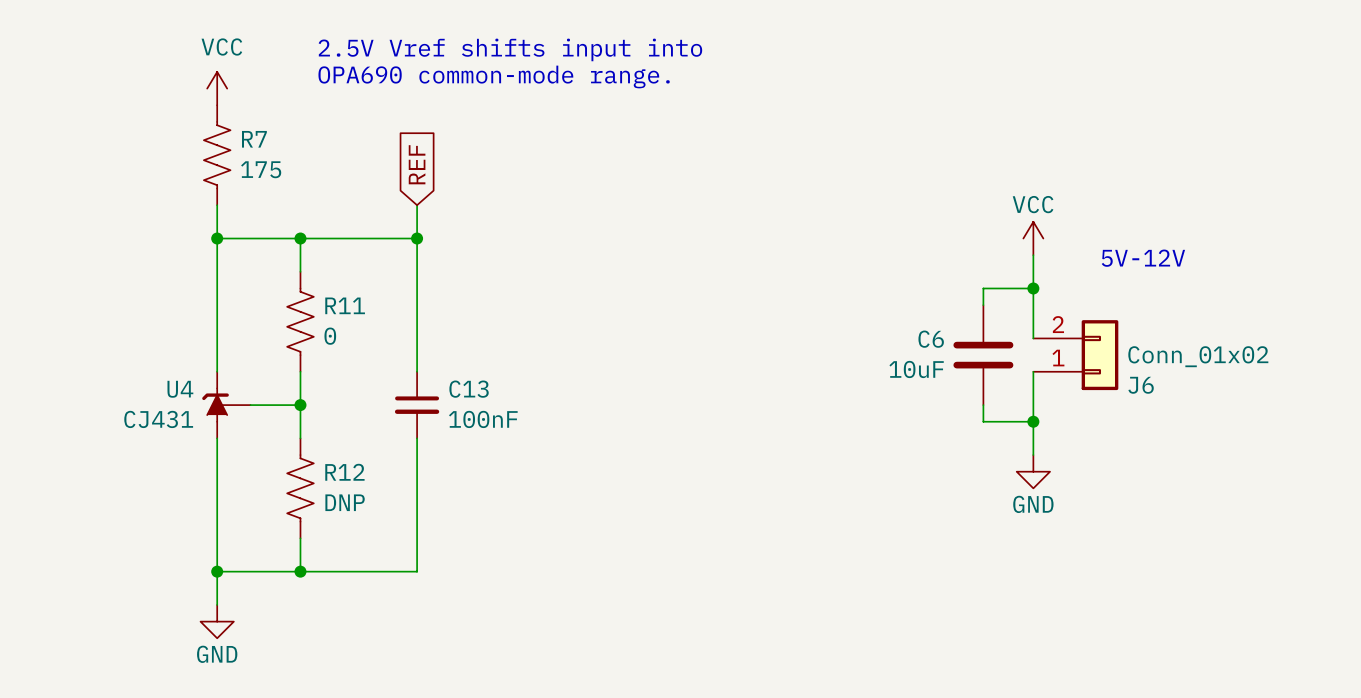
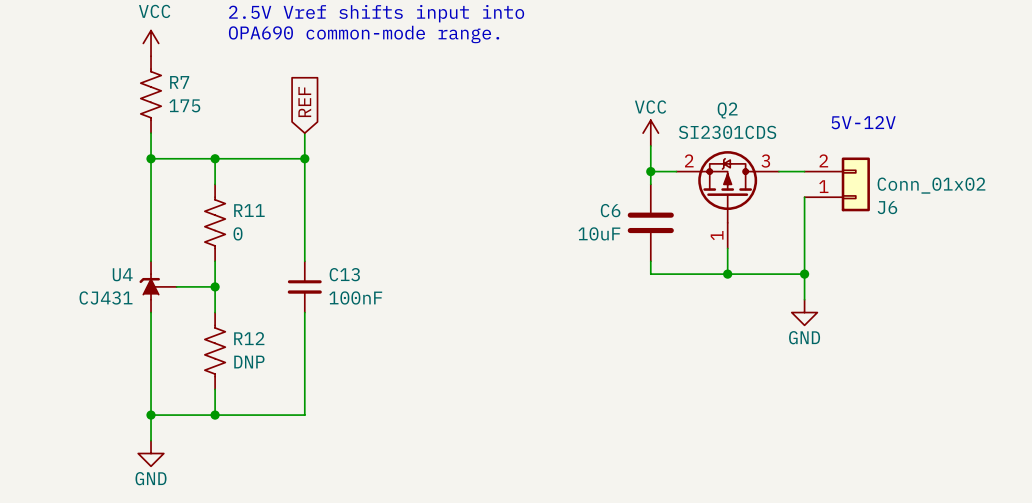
wire: none -> (650, 145) (650, 184)
power symbol position: VCC (1033, 238) -> VCC (650, 133)
wire: none -> (650, 171) (676, 171)
junction: none -> (650, 171)
wire: (1033, 255) (1033, 338) -> (778, 171) (804, 171)
text position: 5V-12V (1143, 258) -> 5V-12V (863, 122)
wire: (1033, 288) (983, 288) (983, 305) -> none
junction: (1033, 288) -> none
wire: none -> (804, 197) (804, 299)
Q2: none -> SI2301CDS (727, 199)
wire: none -> (727, 248) (727, 274)
C6 position: (983, 355) -> (650, 222)
J6 position: (1075, 355) -> (837, 184)
wire: none -> (650, 261) (650, 274) (804, 274)
wire: (1033, 371) (1033, 455) -> none
junction: none -> (727, 274)
junction: none -> (804, 274)
wire: (983, 405) (983, 421) (1033, 421) -> none
junction: (1033, 421) -> none
power symbol position: GND (1033, 471) -> GND (804, 312)

